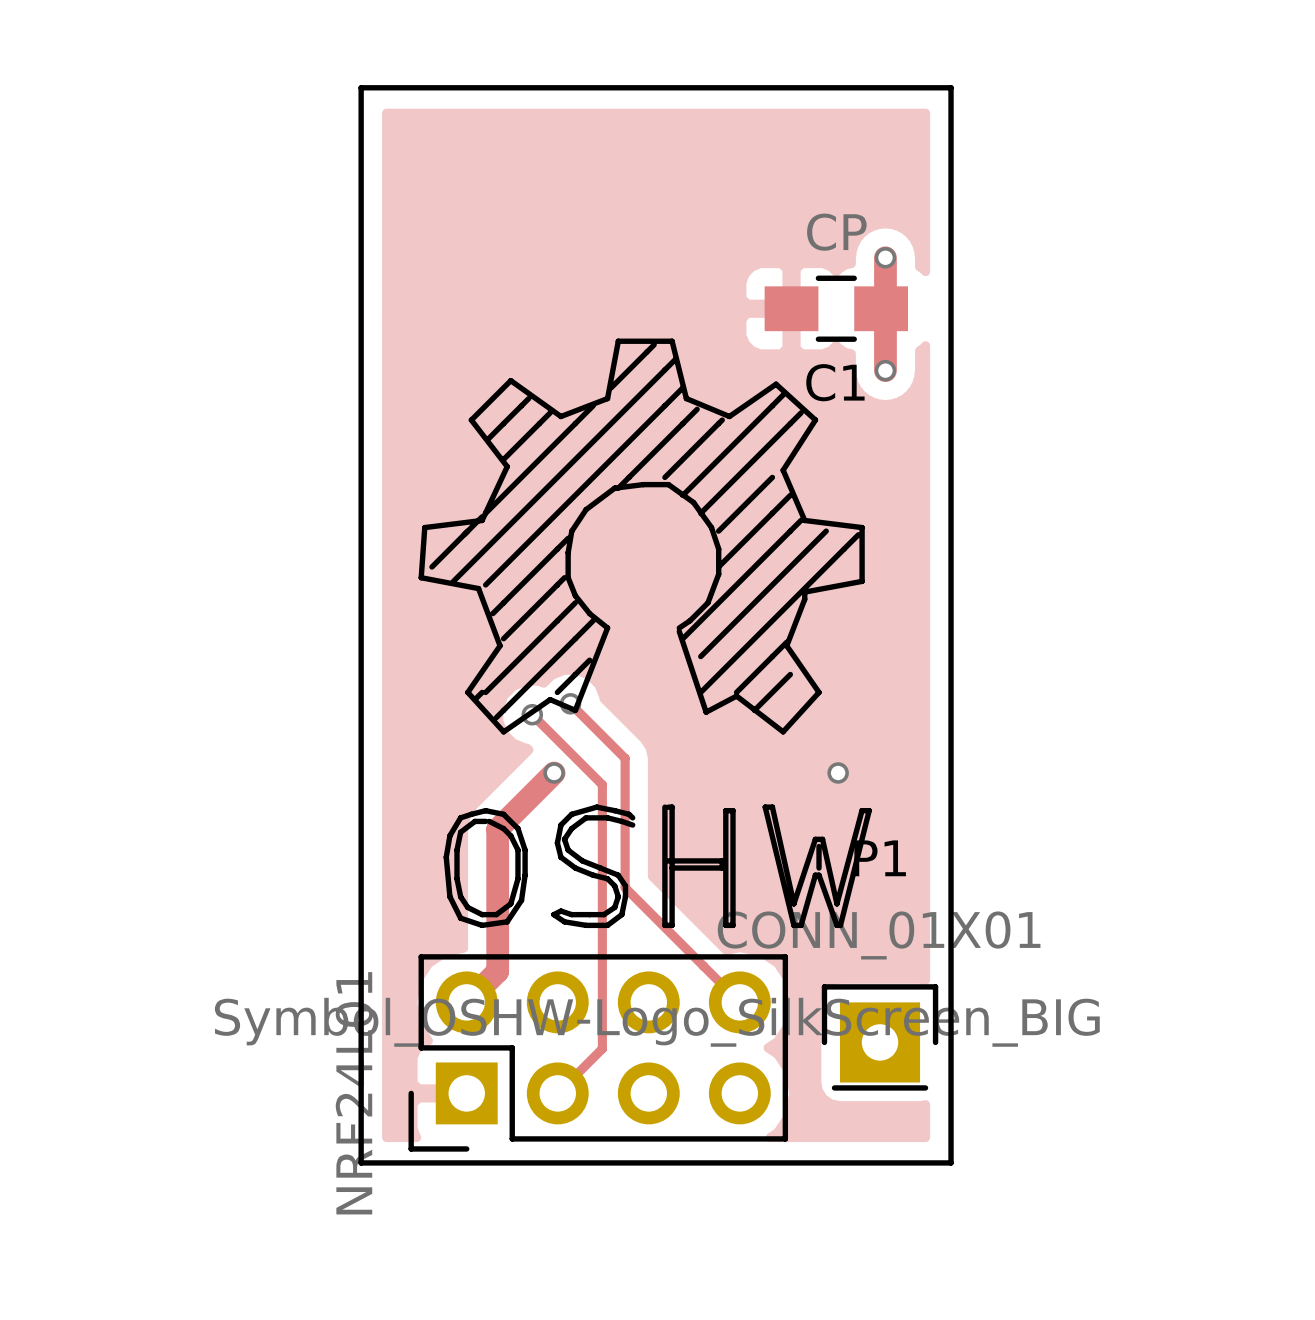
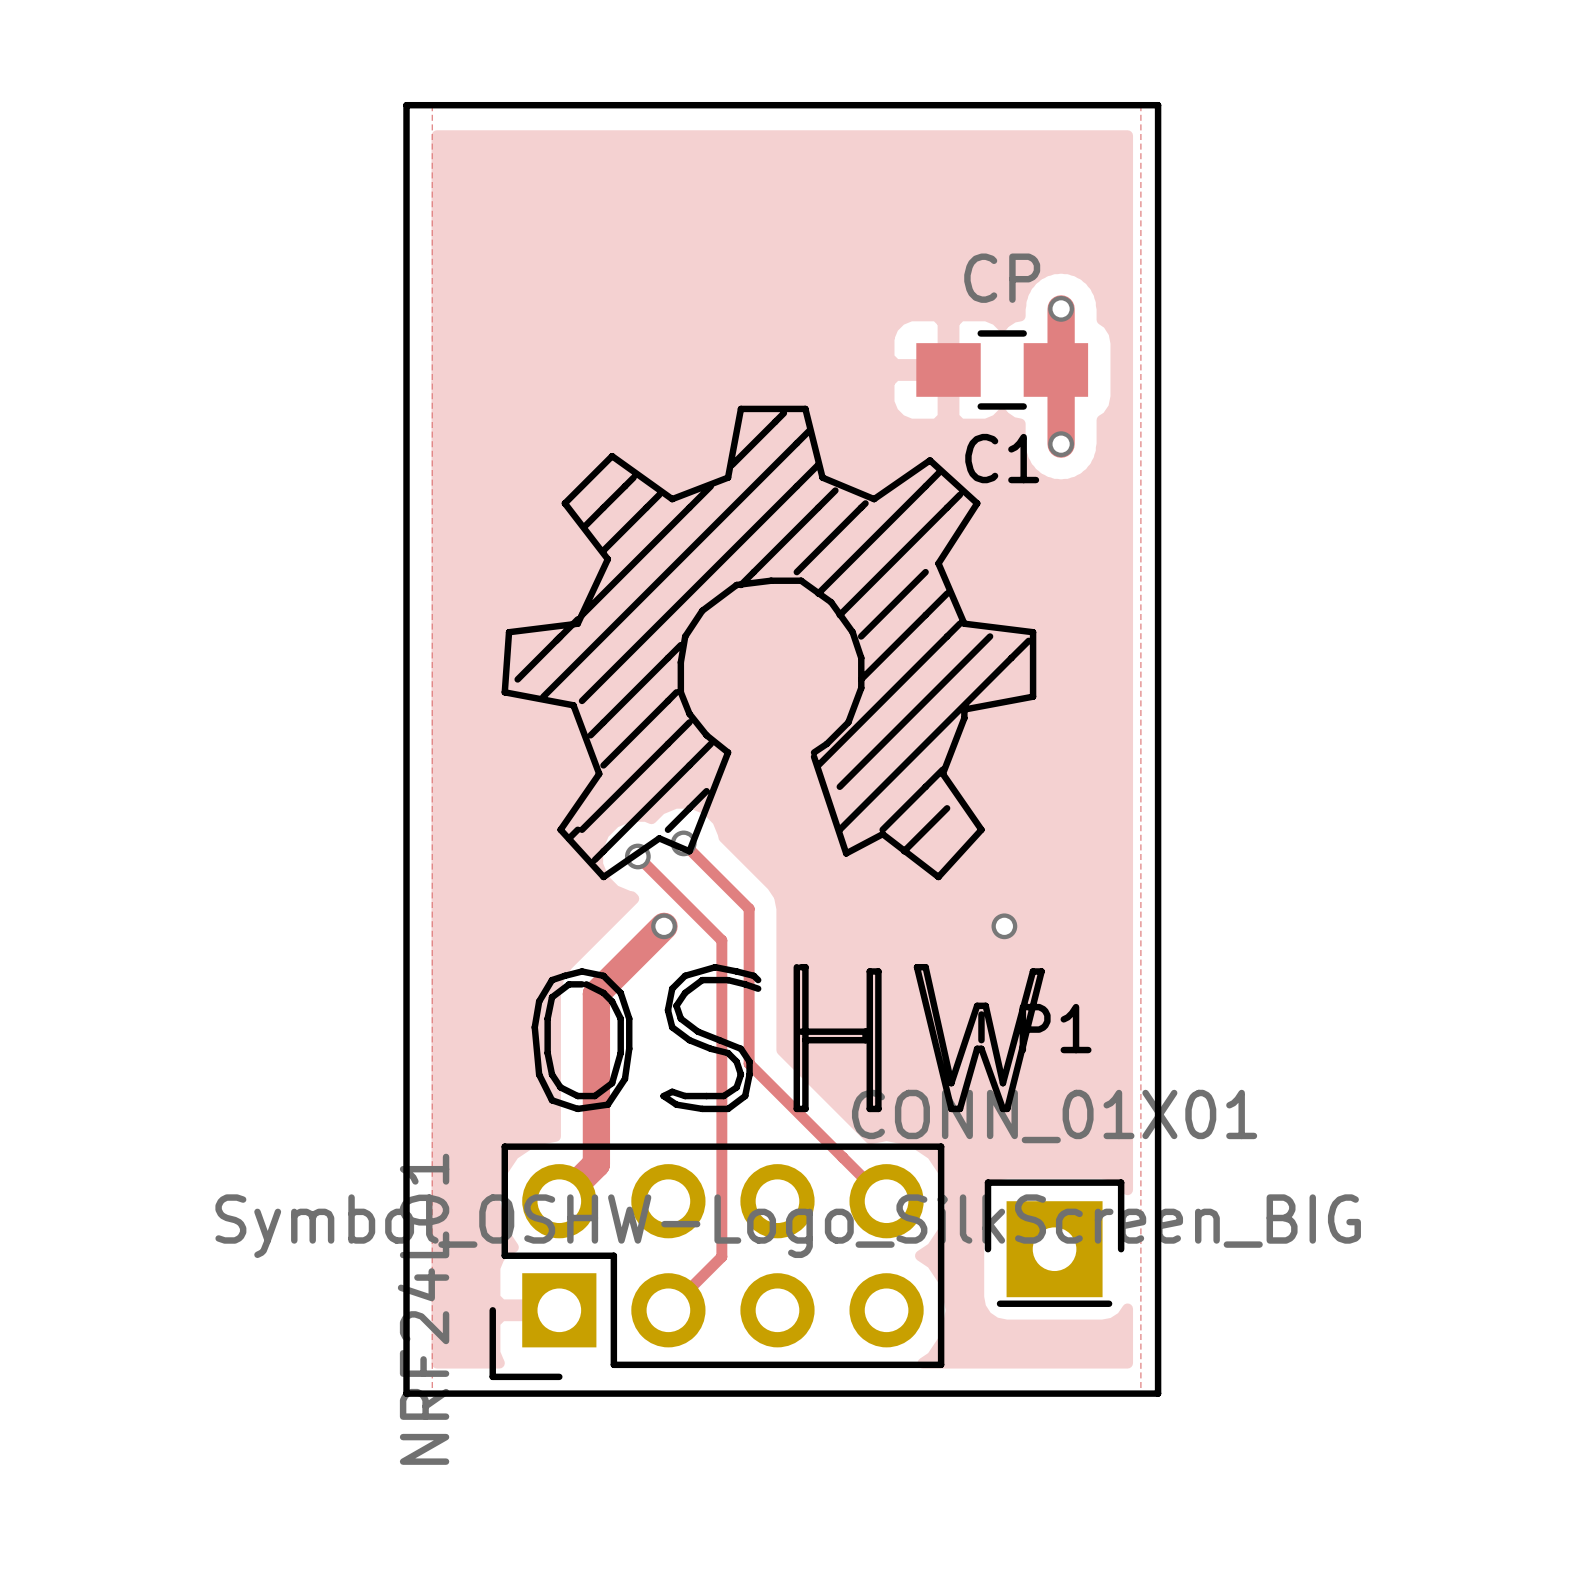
board edge: (361, 87) (361, 1162) -> (432, 105) (406, 105) (406, 1393) (432, 1393)
board edge: (951, 87) (951, 1162) -> (1139, 105) (1158, 105) (1158, 1393) (1139, 1393)

